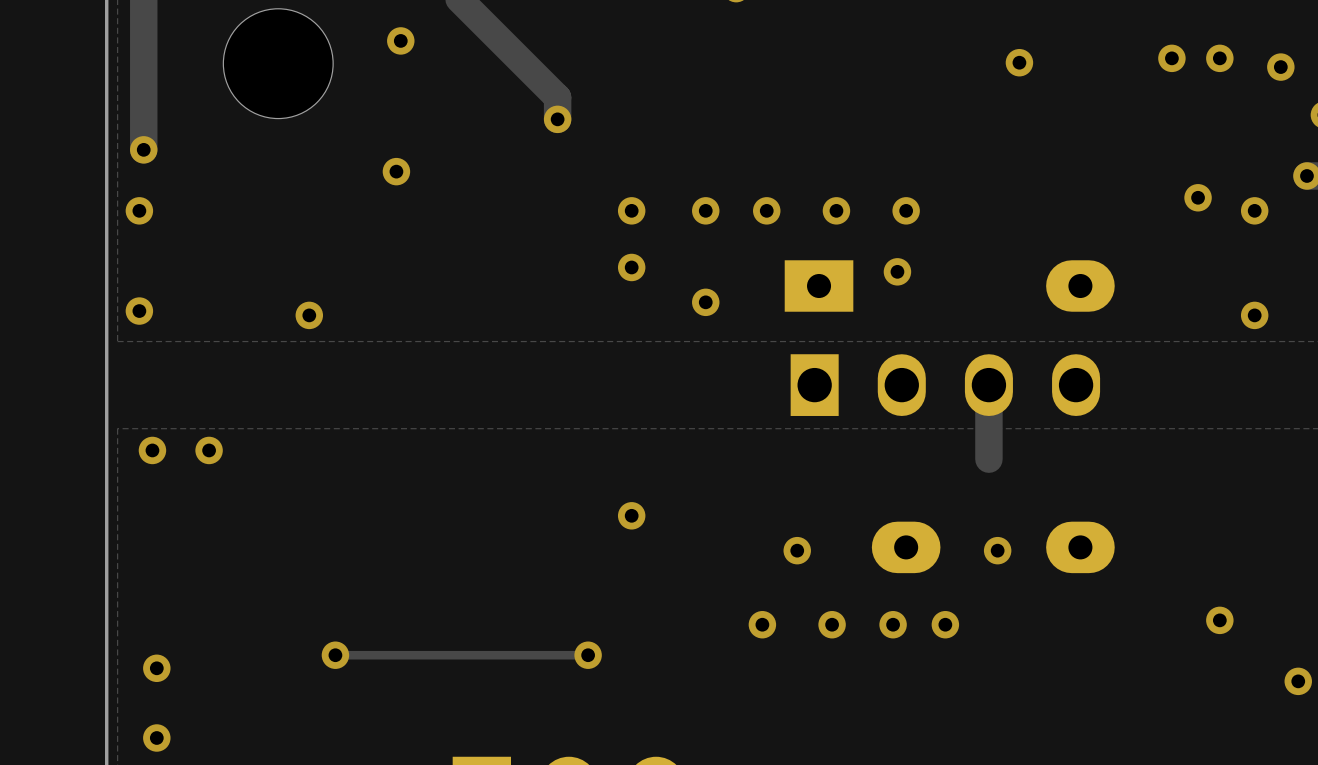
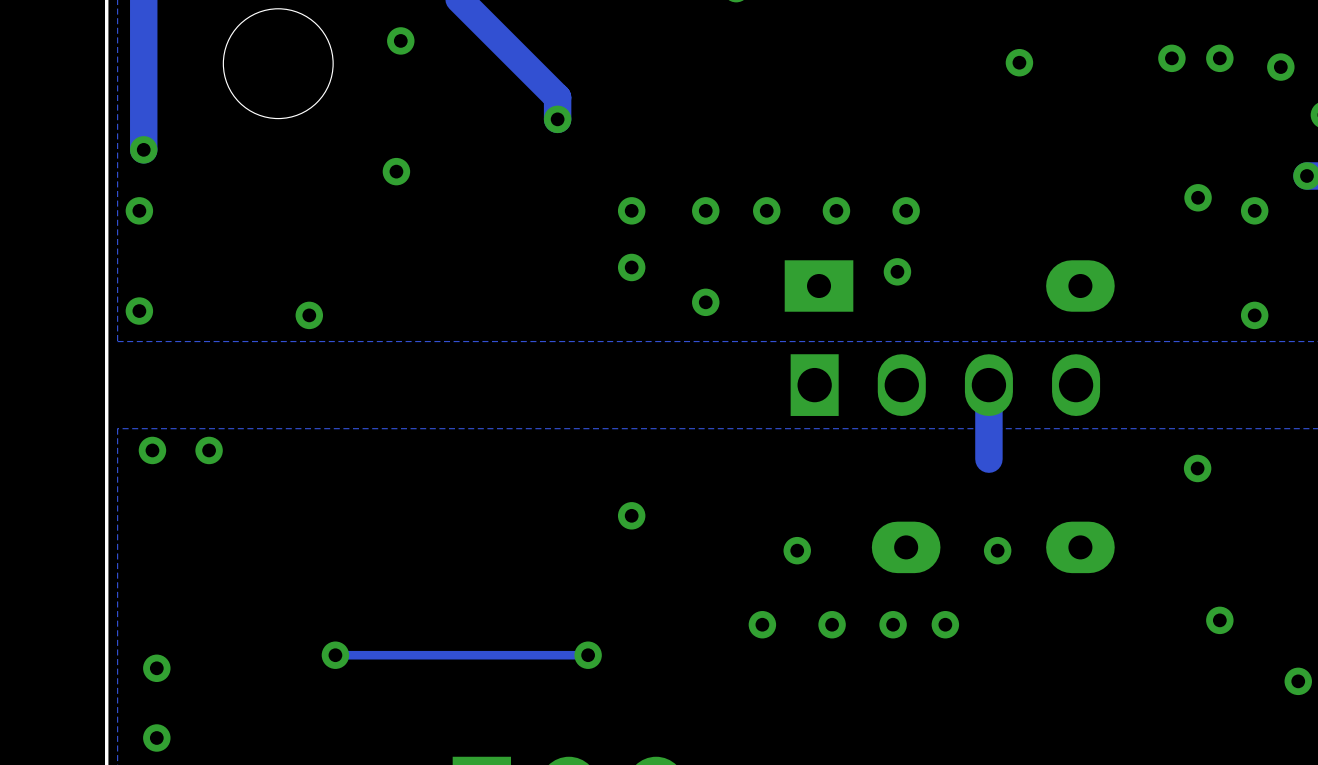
via: none -> (1197, 468)

